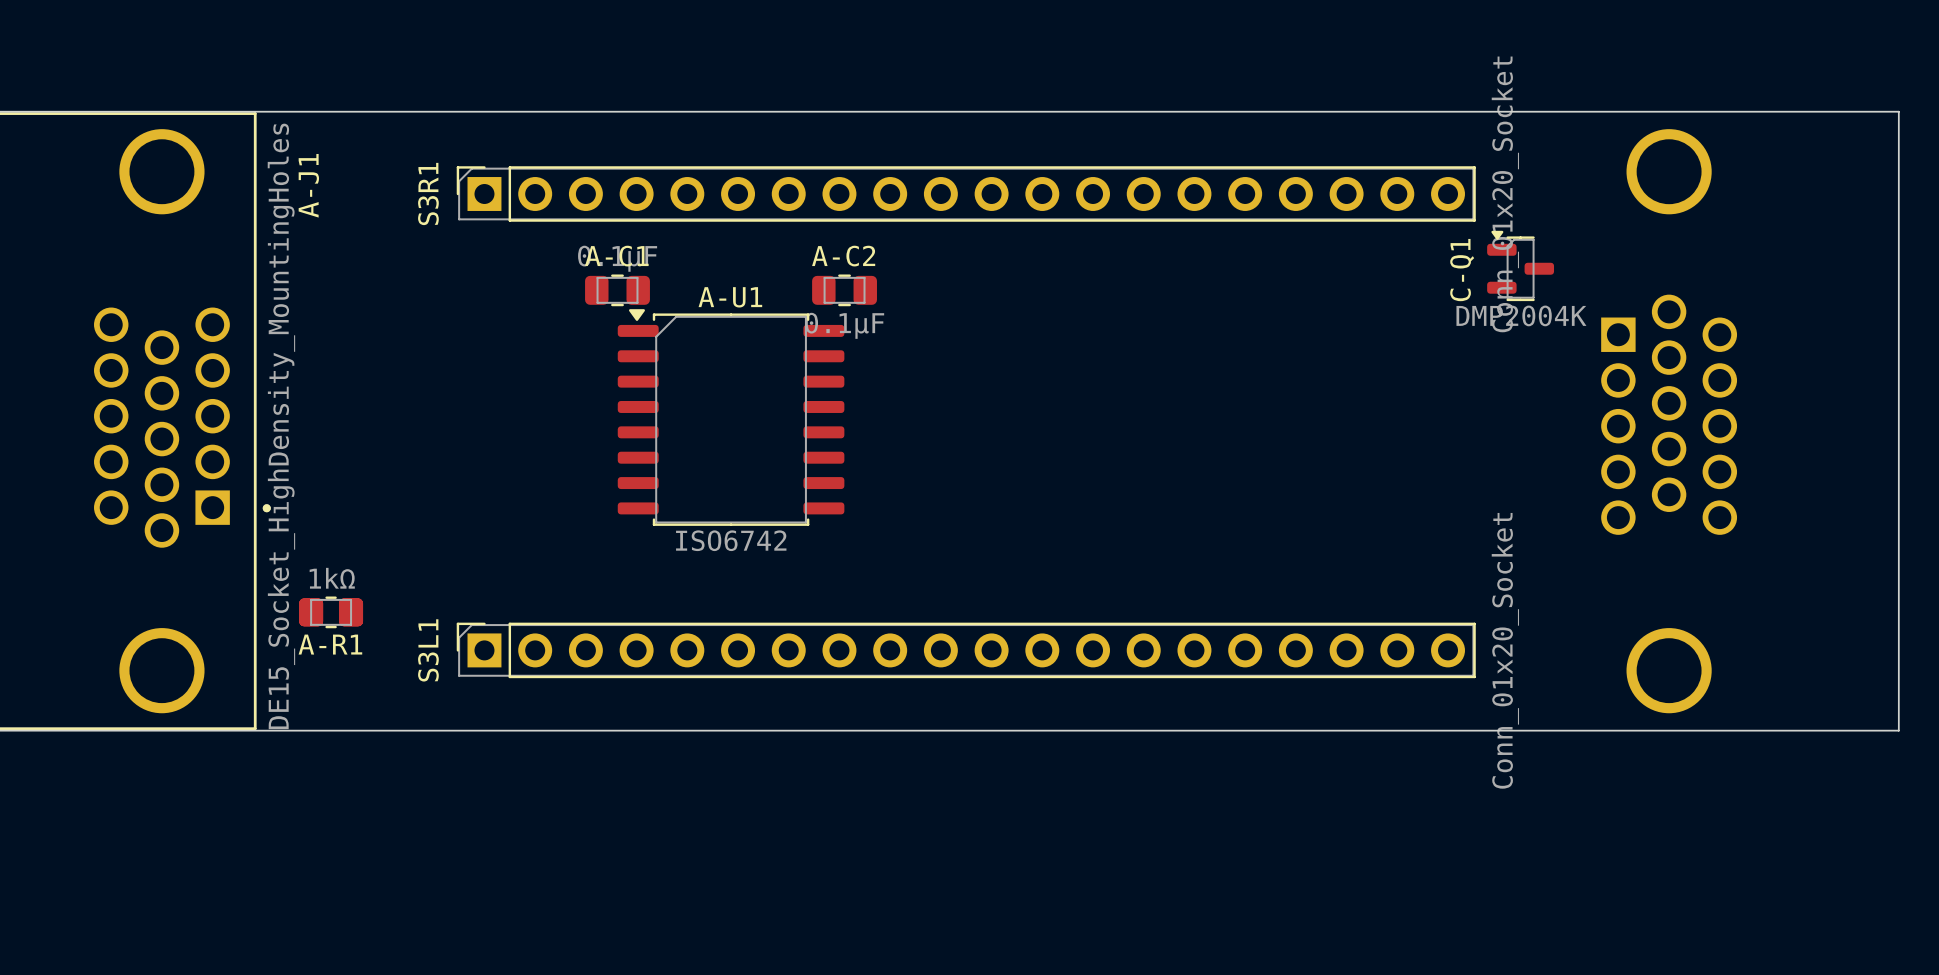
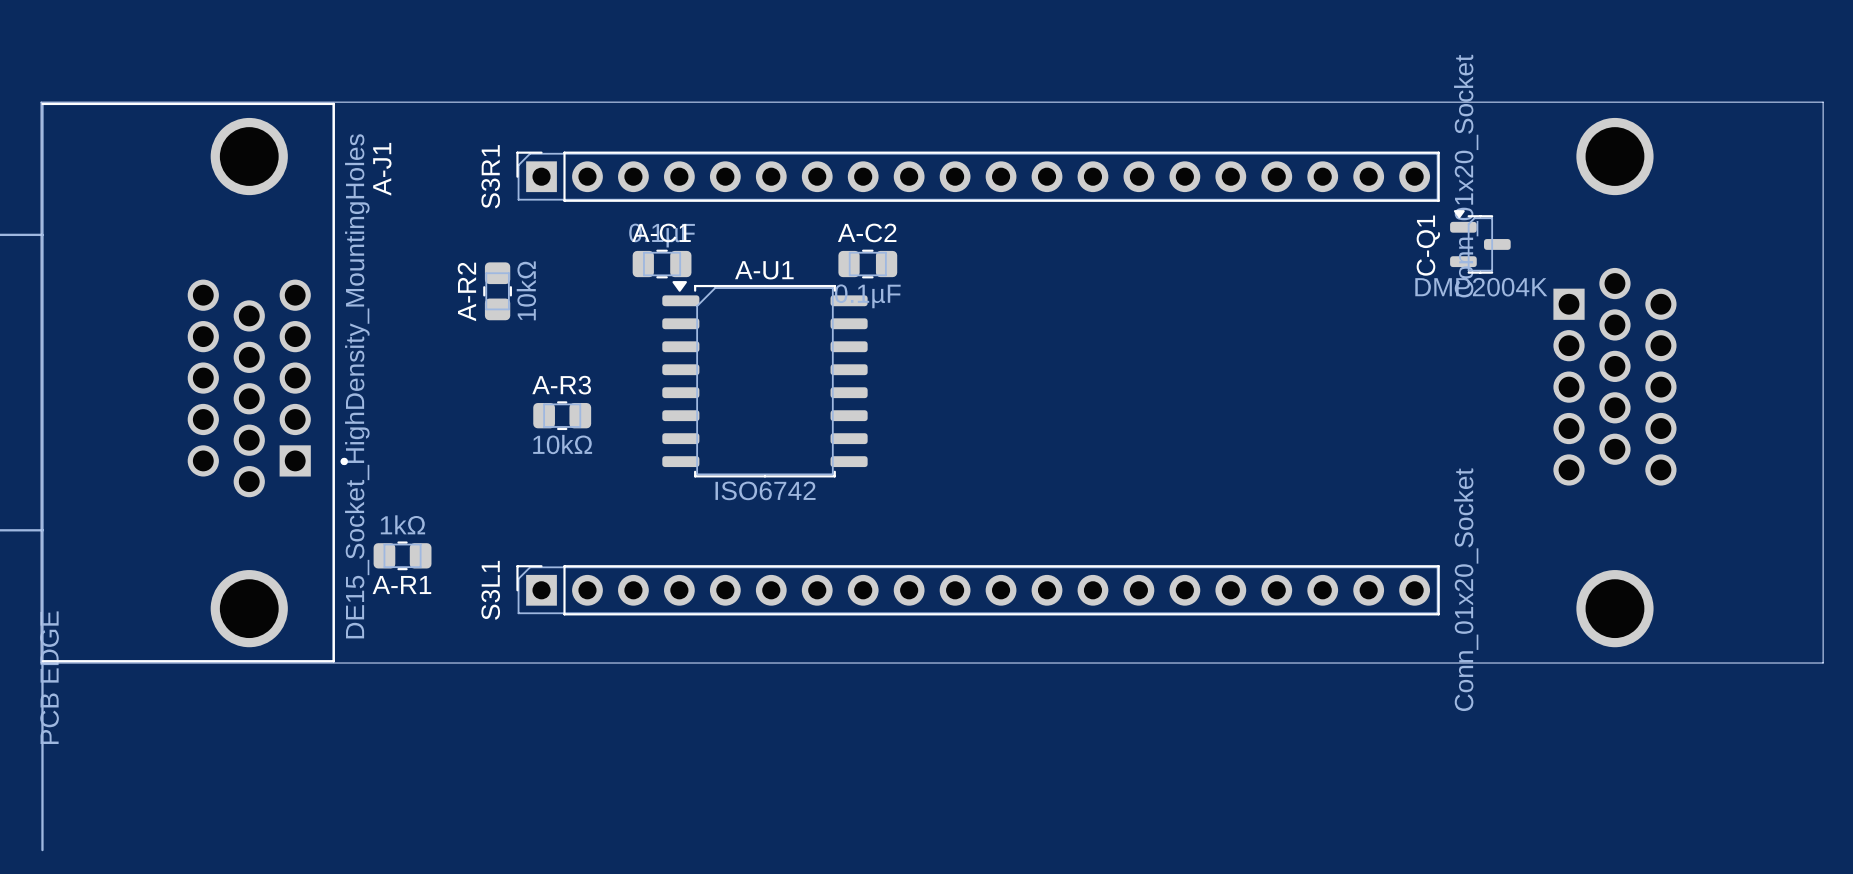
A-R2: none -> 10kΩ (497, 291)
A-R3: none -> 10kΩ (562, 415)
part: (311, 612) -> none
part: (351, 612) -> none

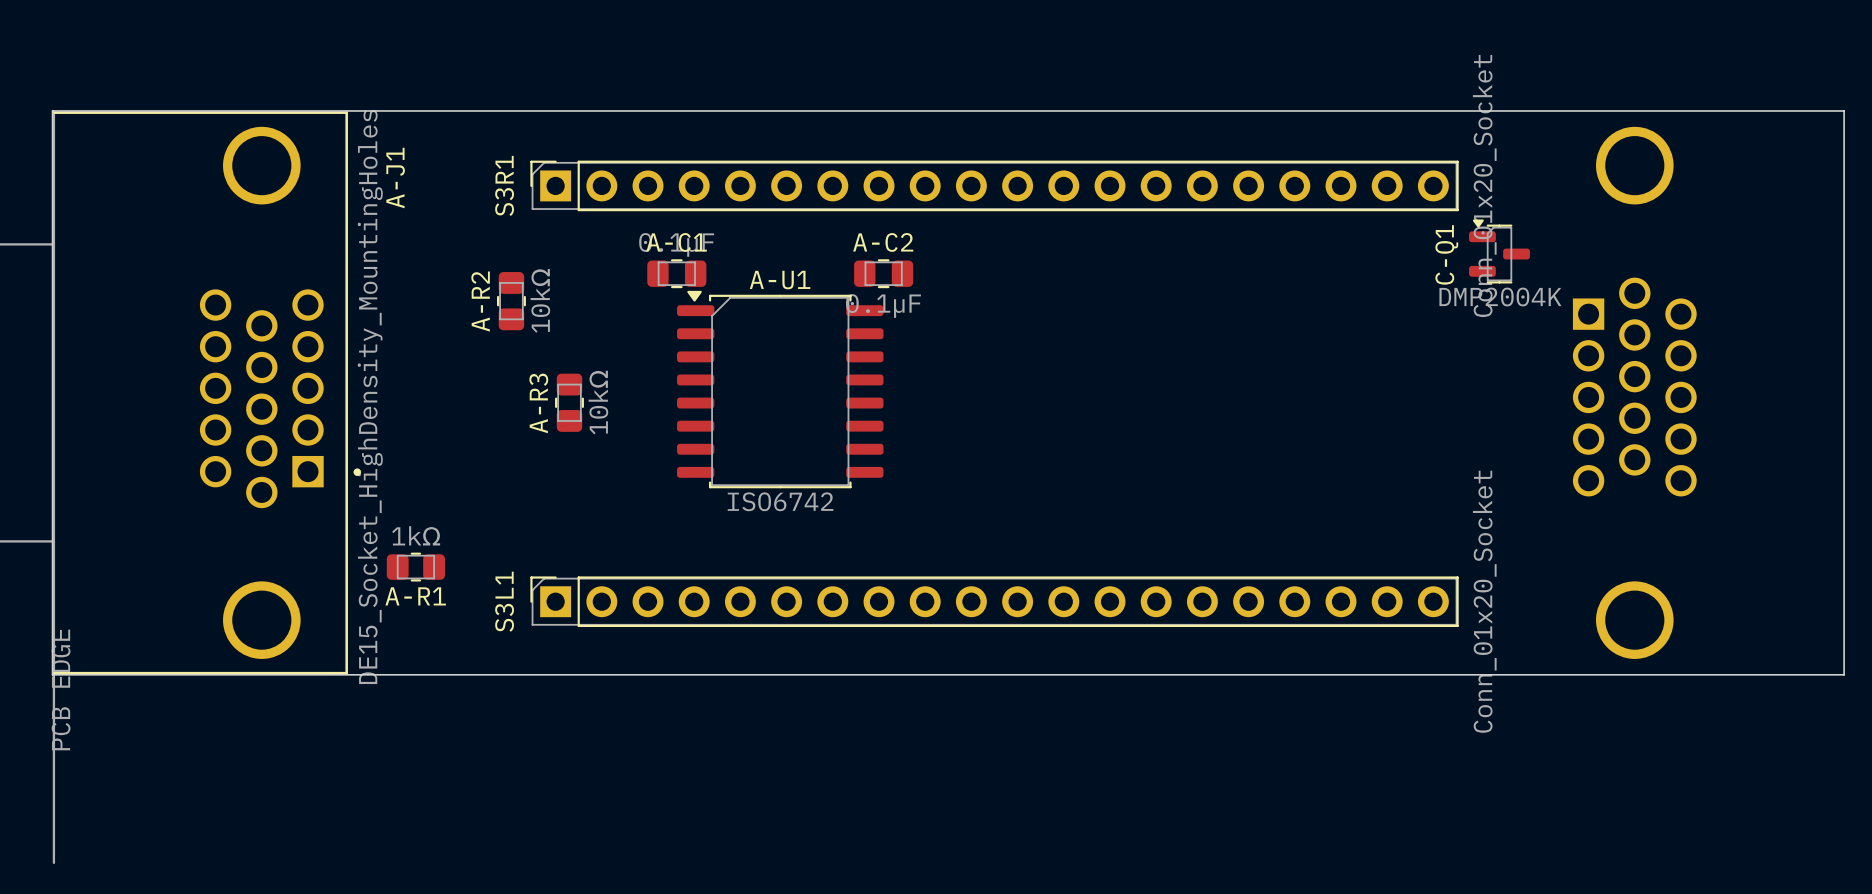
A-R3 name position: A-R3 (561, 385) -> A-R3 (538, 403)
A-R3 rotation: 0° (562, 415) -> 90° clockwise (569, 402)
A-R3 value position: 10kΩ (562, 444) -> 10kΩ (598, 402)

